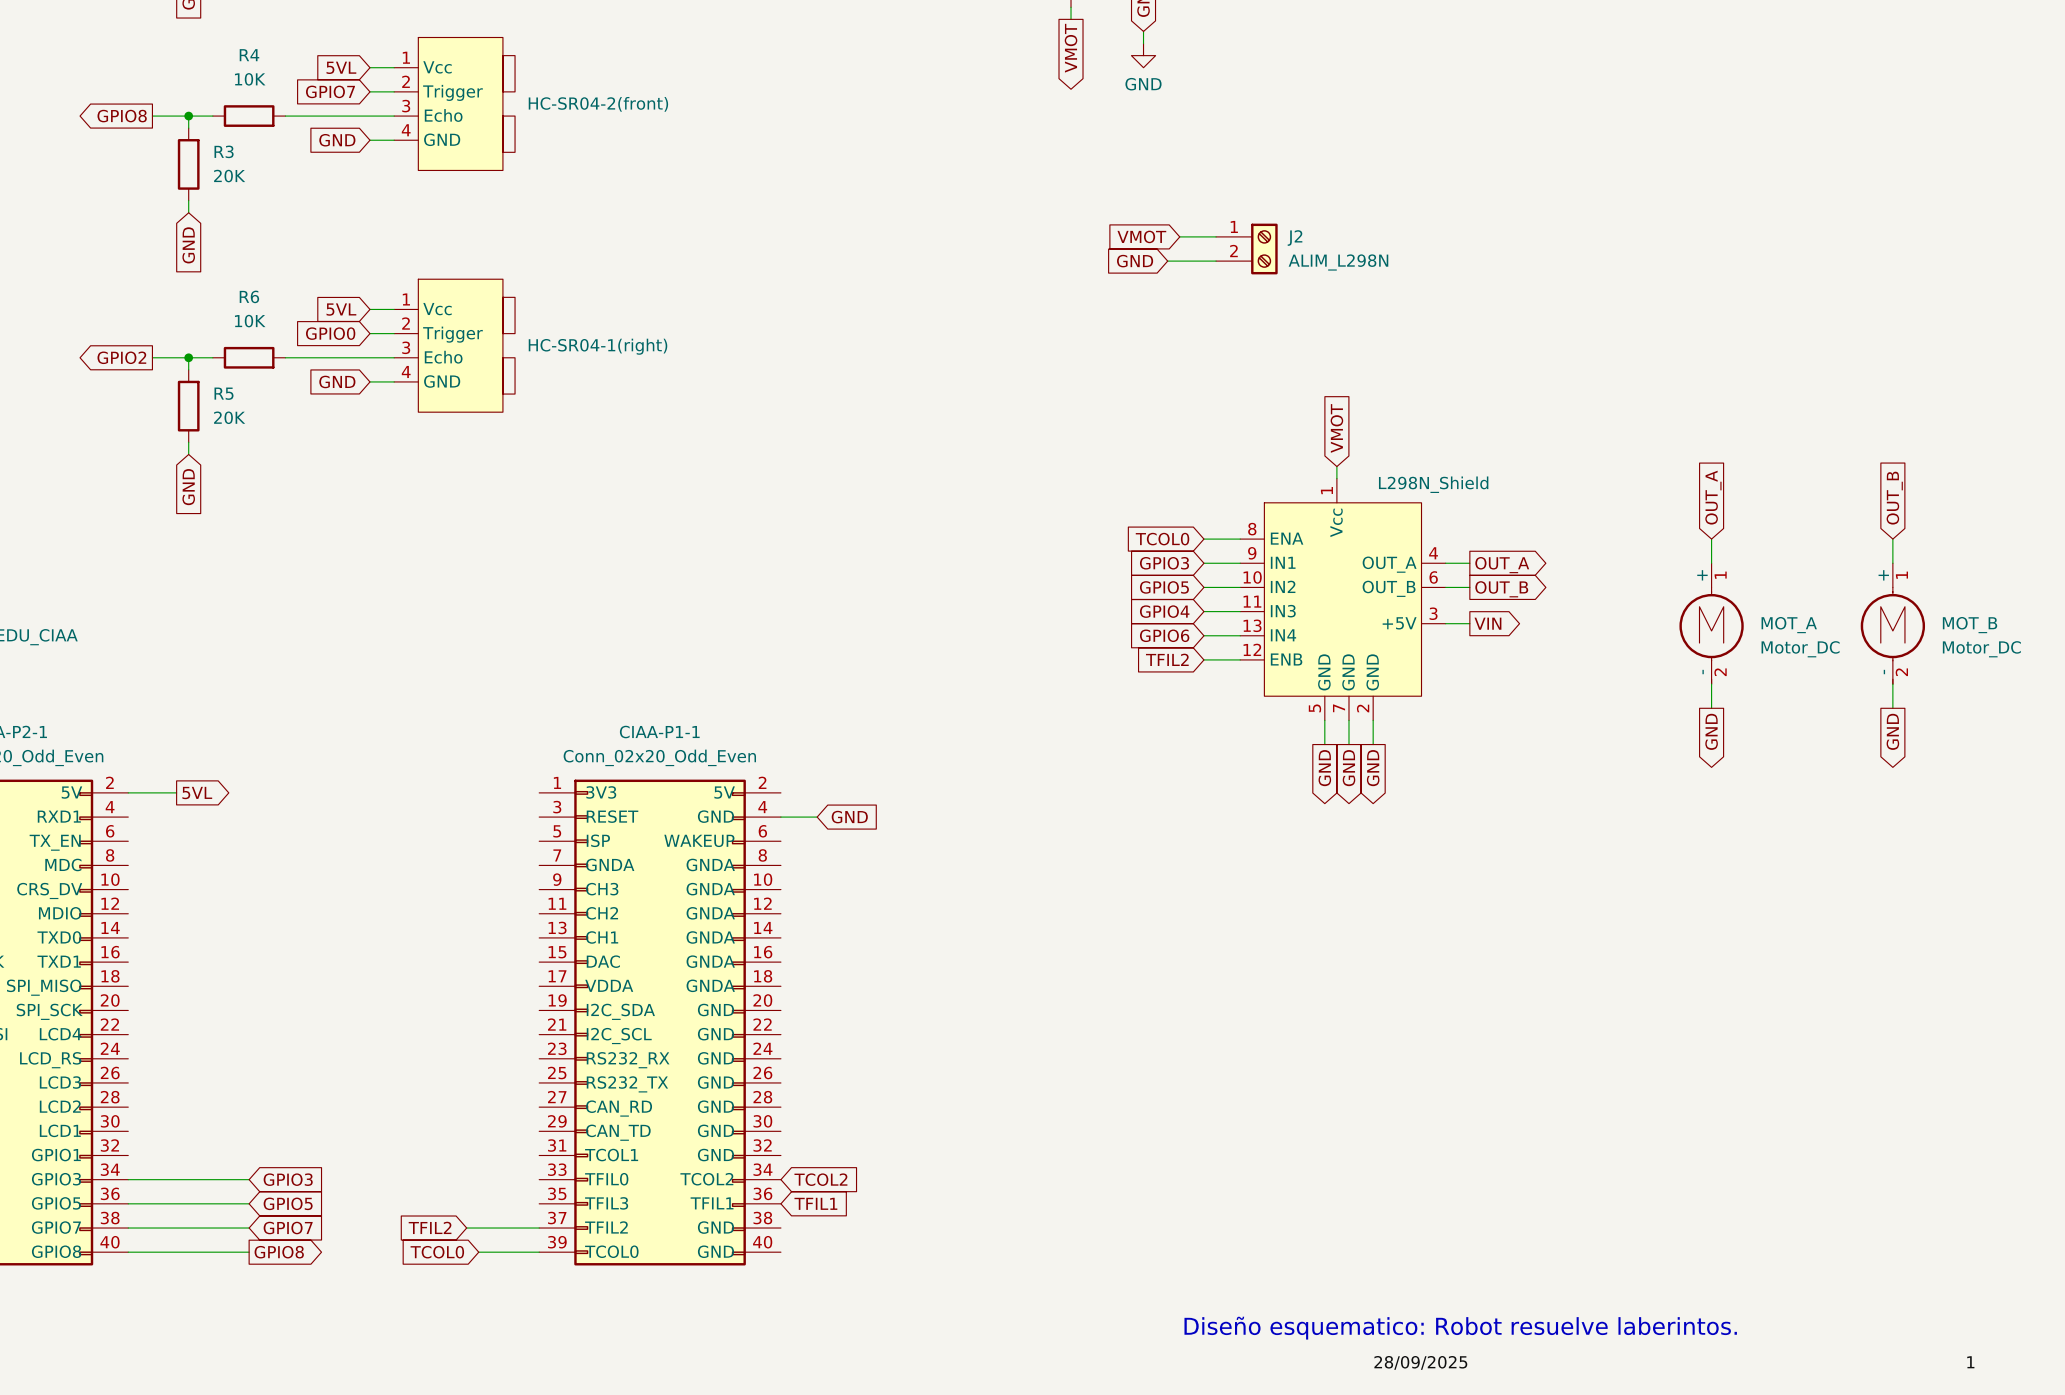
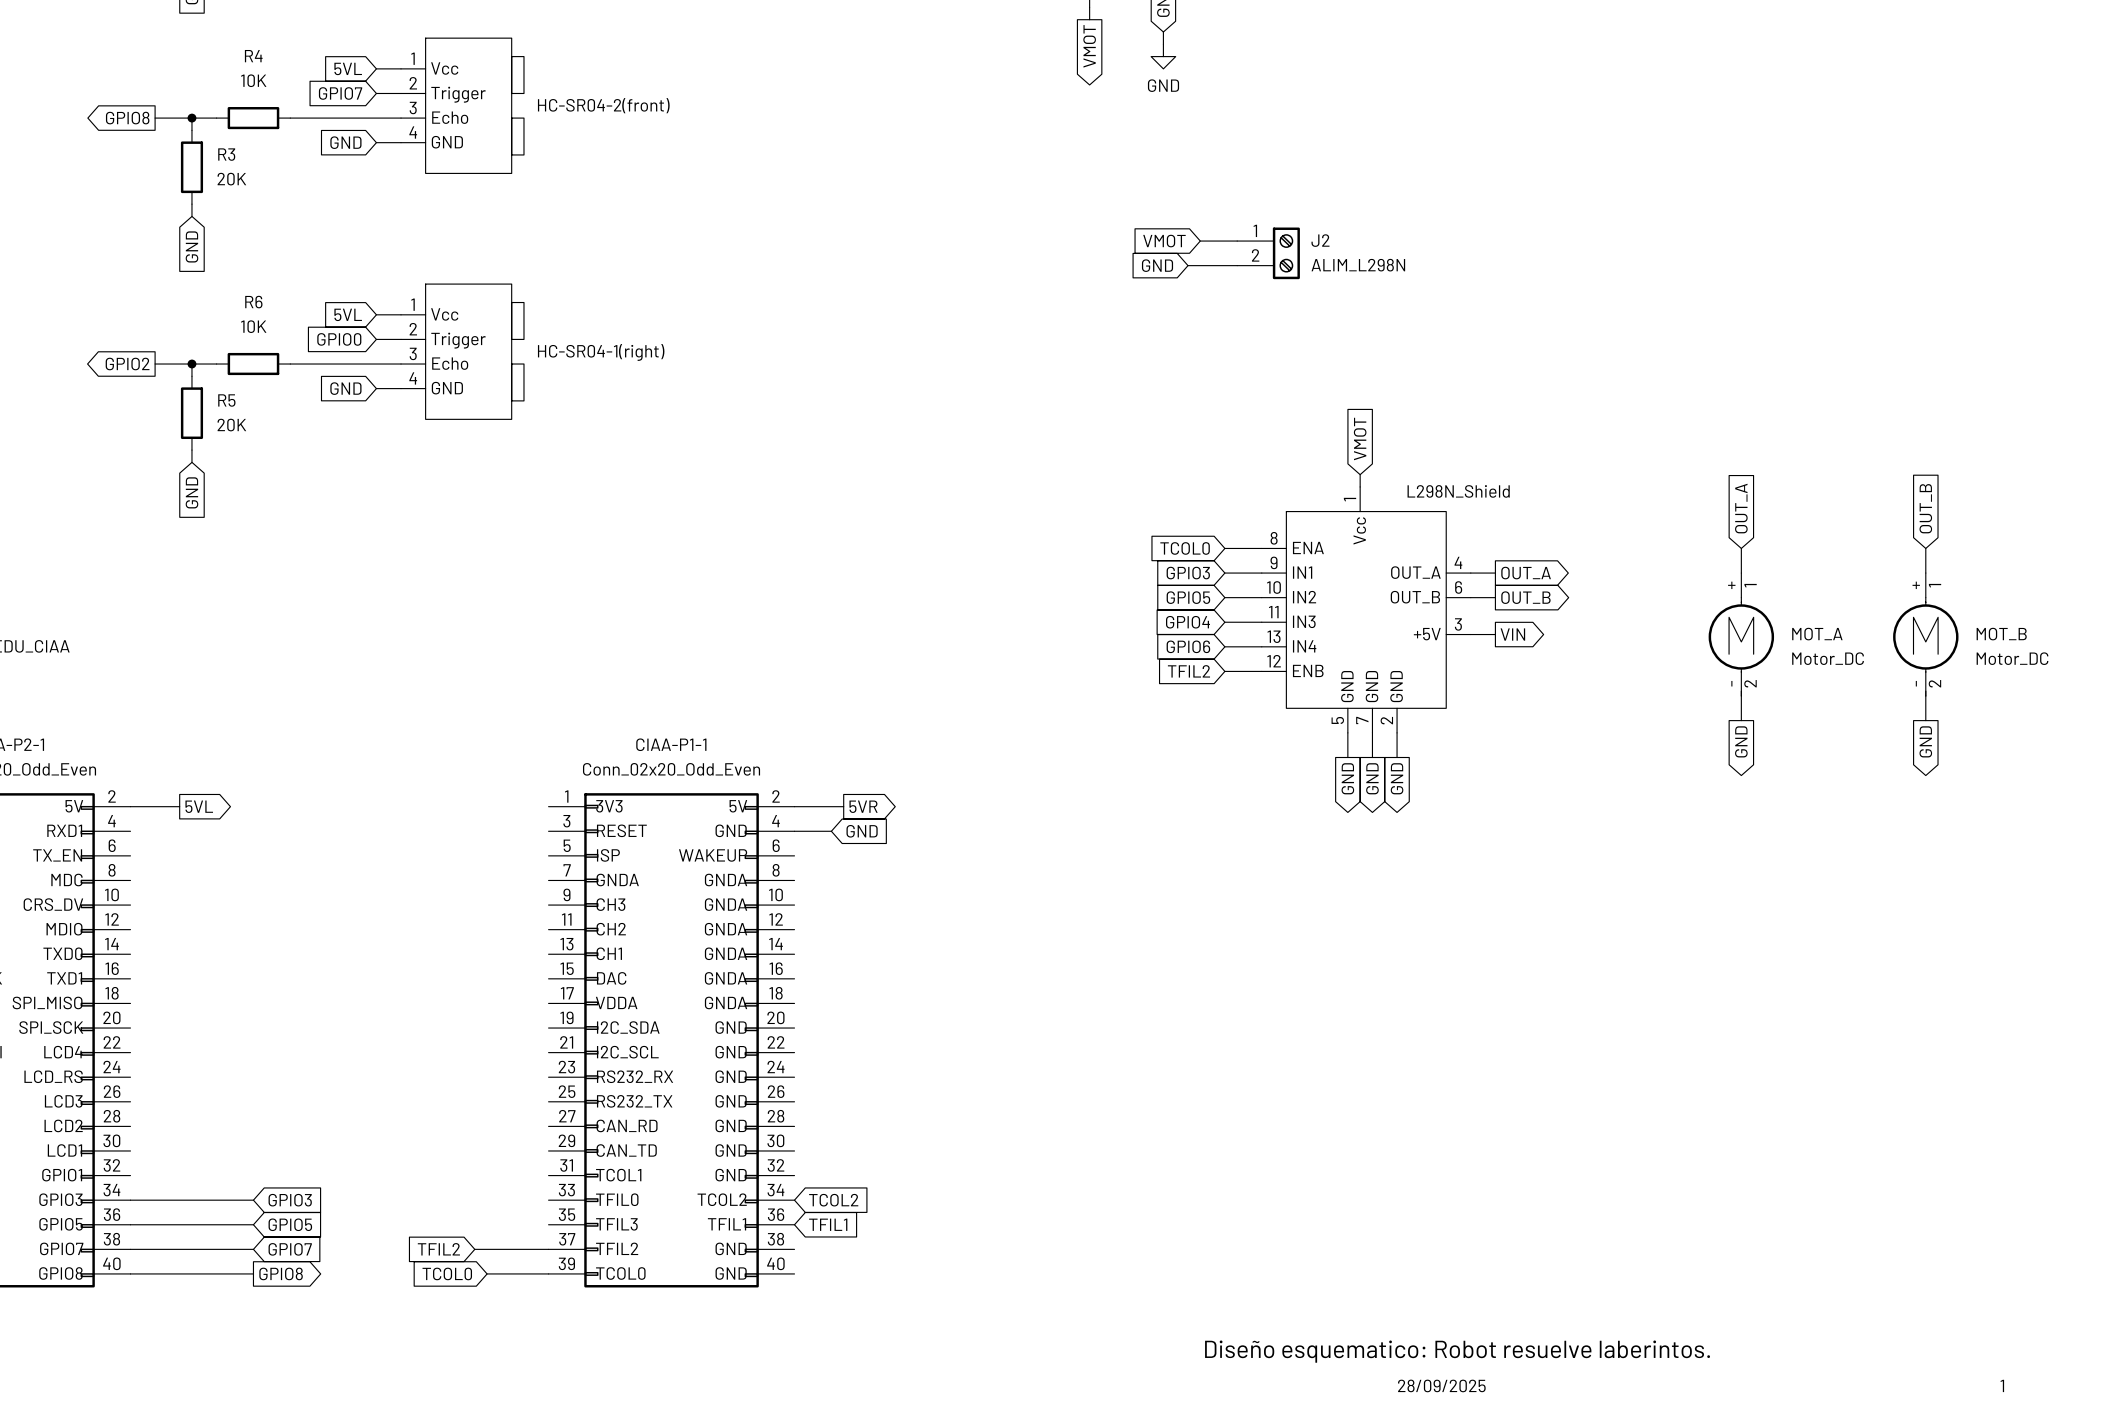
wire: none -> (794, 806) (843, 806)
global label: none -> 5VR (863, 806)

